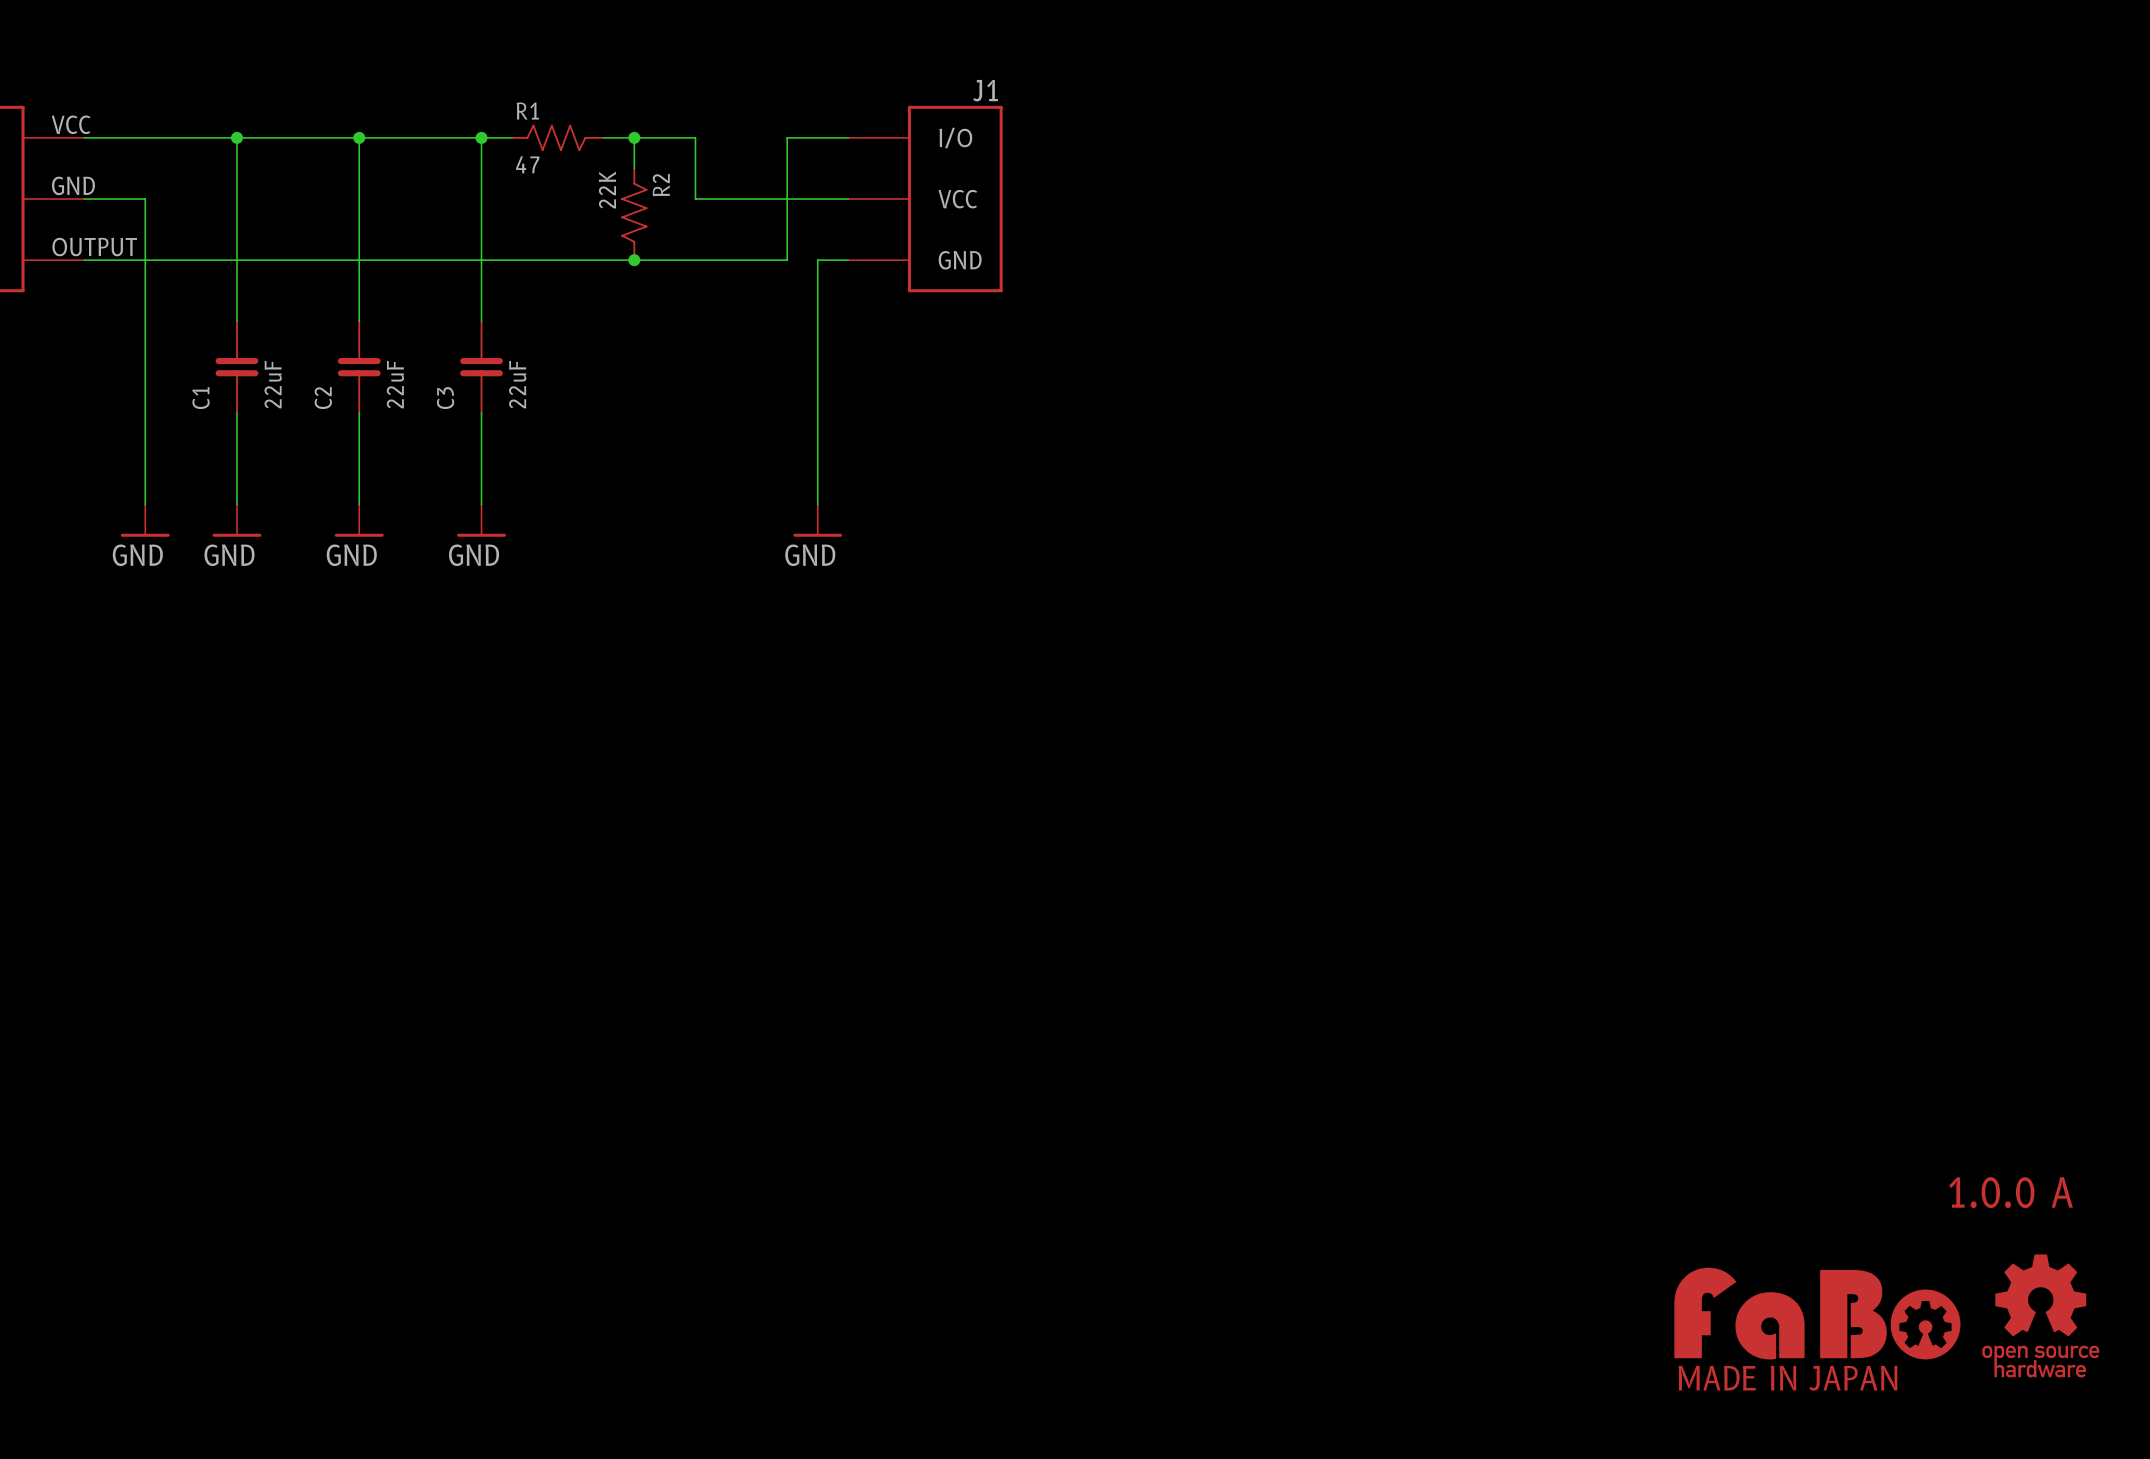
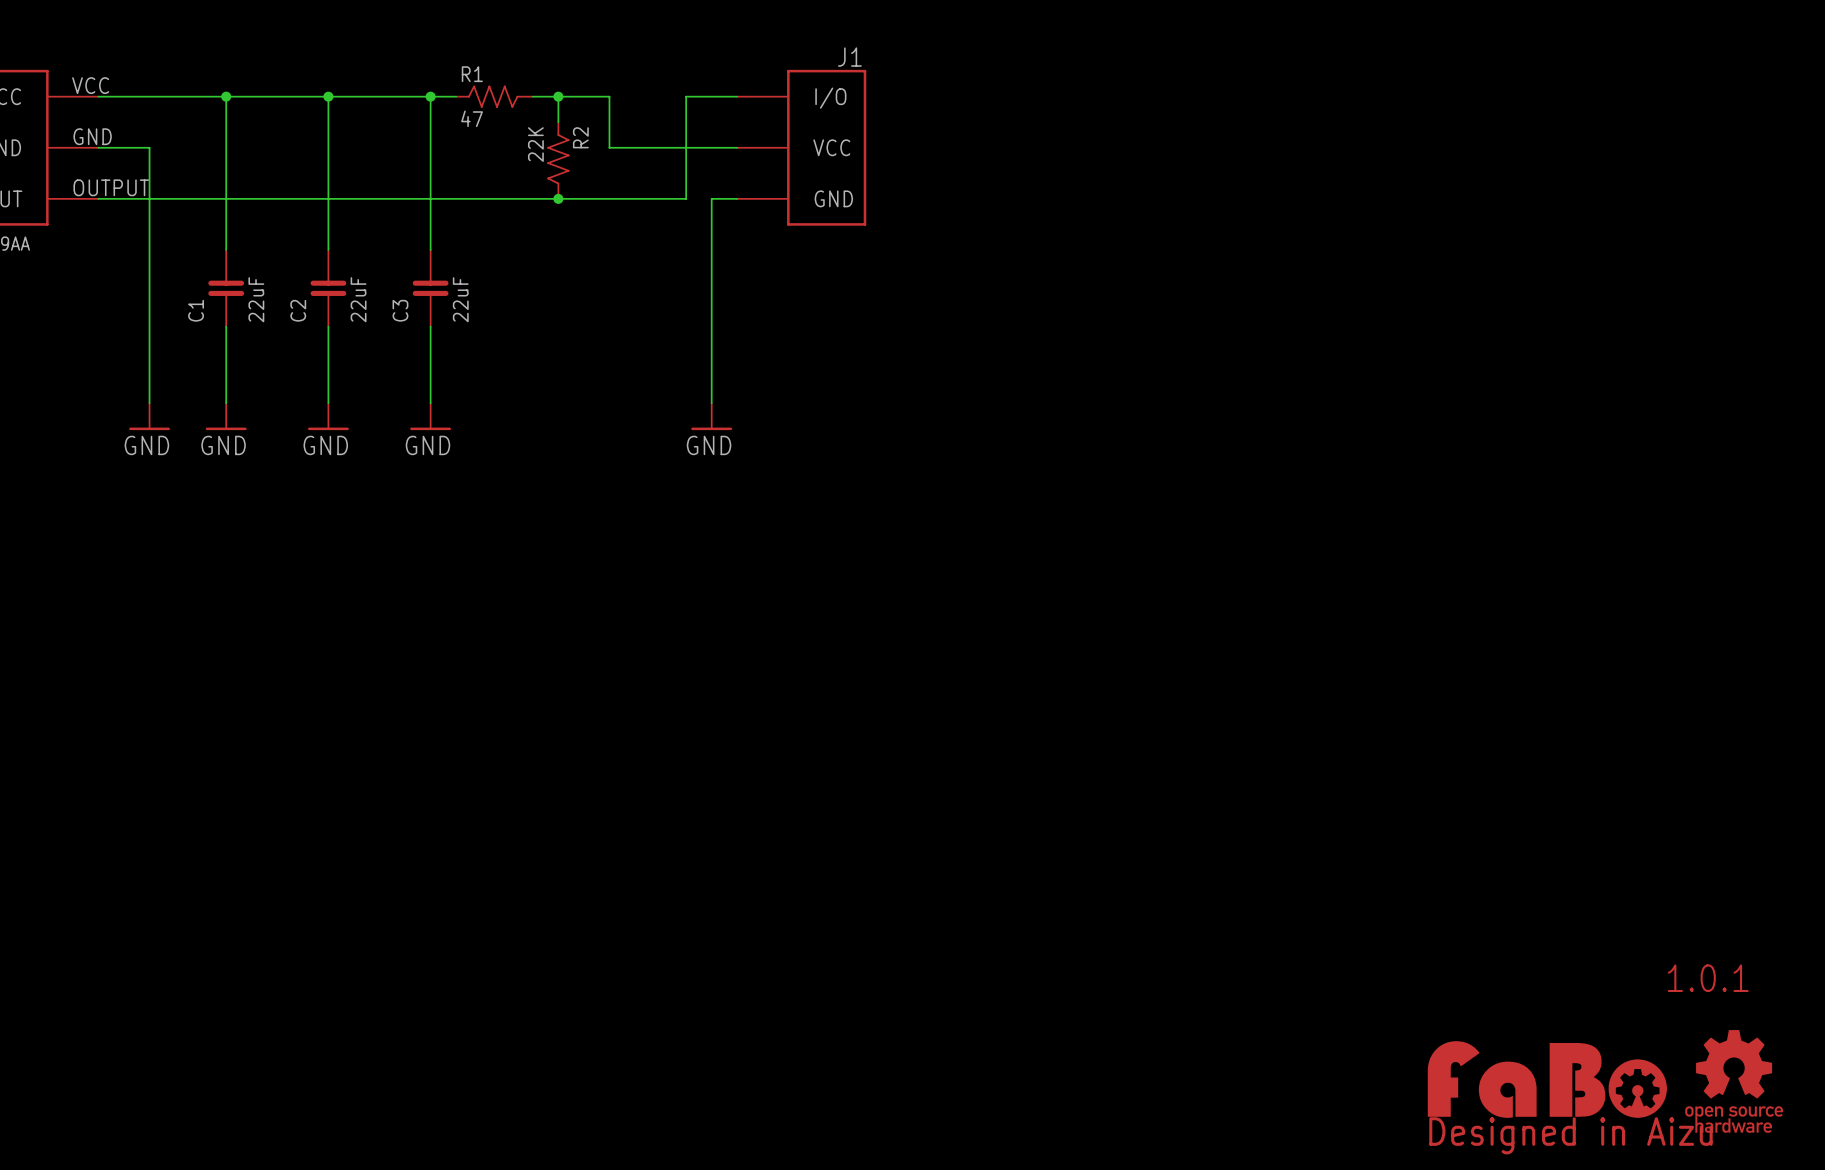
text: 1.0.0 A (2011, 1192) -> 1.0.1 (1708, 978)
part text: MADE IN JAPAN (1787, 1378) -> none
part text: none -> Designed in Aizu (1570, 1135)

